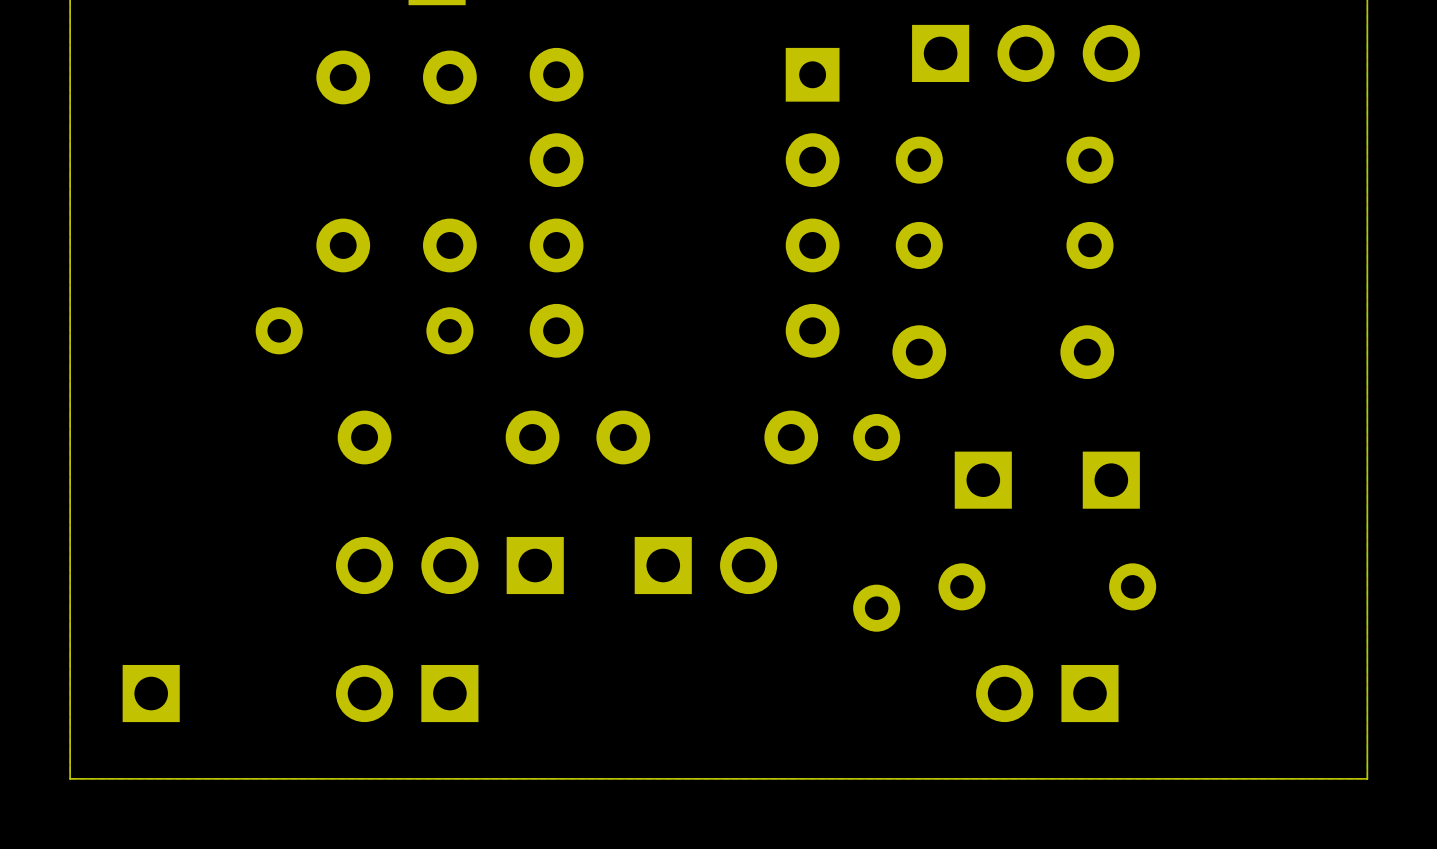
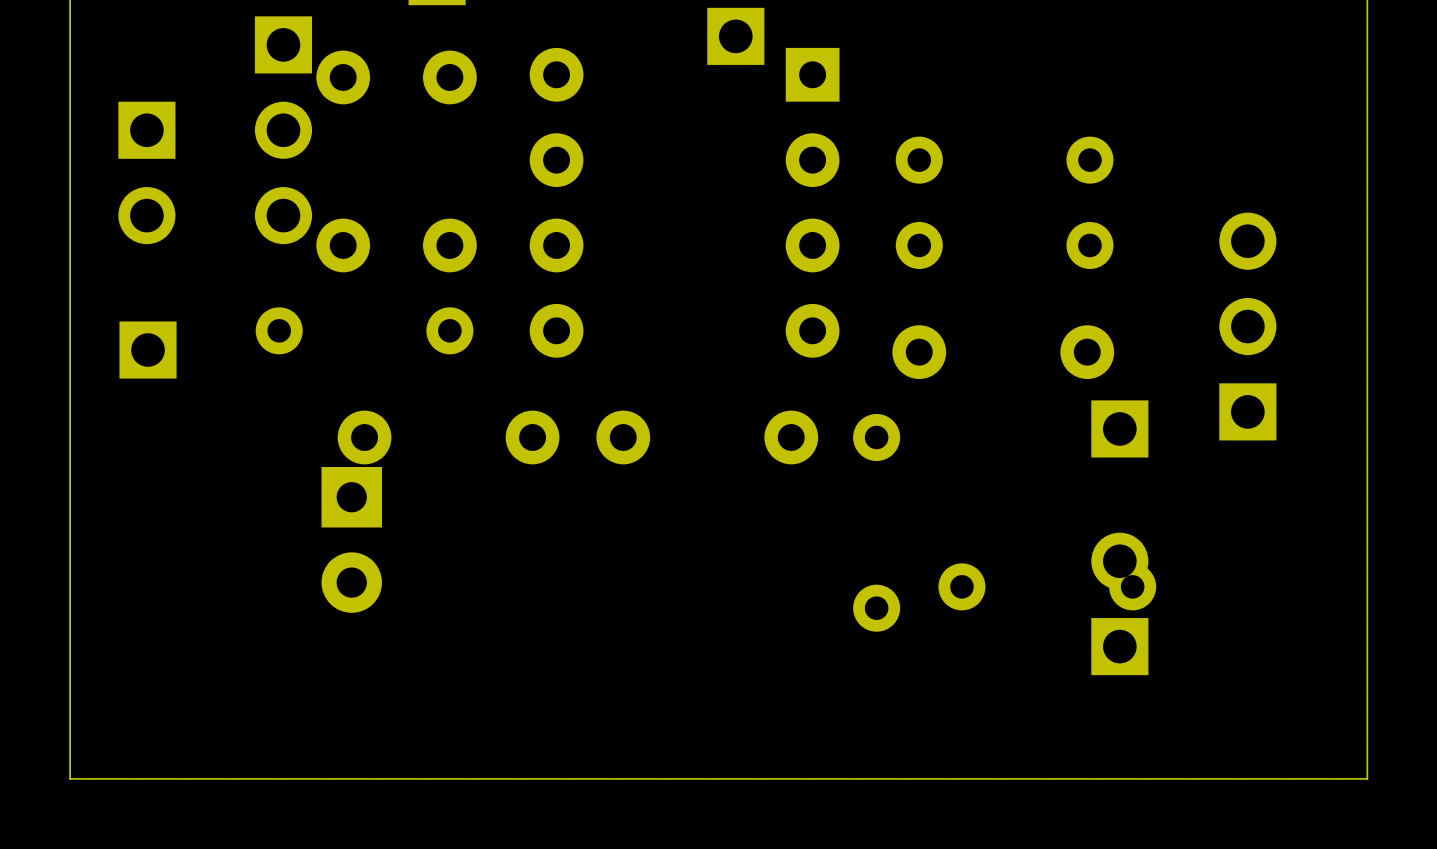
part: none -> (735, 36)
part rotation: 0° (1025, 53) -> 90° counterclockwise (1247, 326)
part position: (1025, 53) -> (1247, 326)
part: none -> (283, 130)
part: none -> (146, 172)
part: (983, 480) -> none
part position: (1111, 480) -> (1119, 428)
part: none -> (351, 539)
part: (449, 565) -> none
part: (705, 565) -> none
part position: (151, 693) -> (148, 350)
part: (407, 693) -> none
part rotation: 0° (1047, 693) -> 90° clockwise (1119, 603)
part position: (1047, 693) -> (1119, 603)

